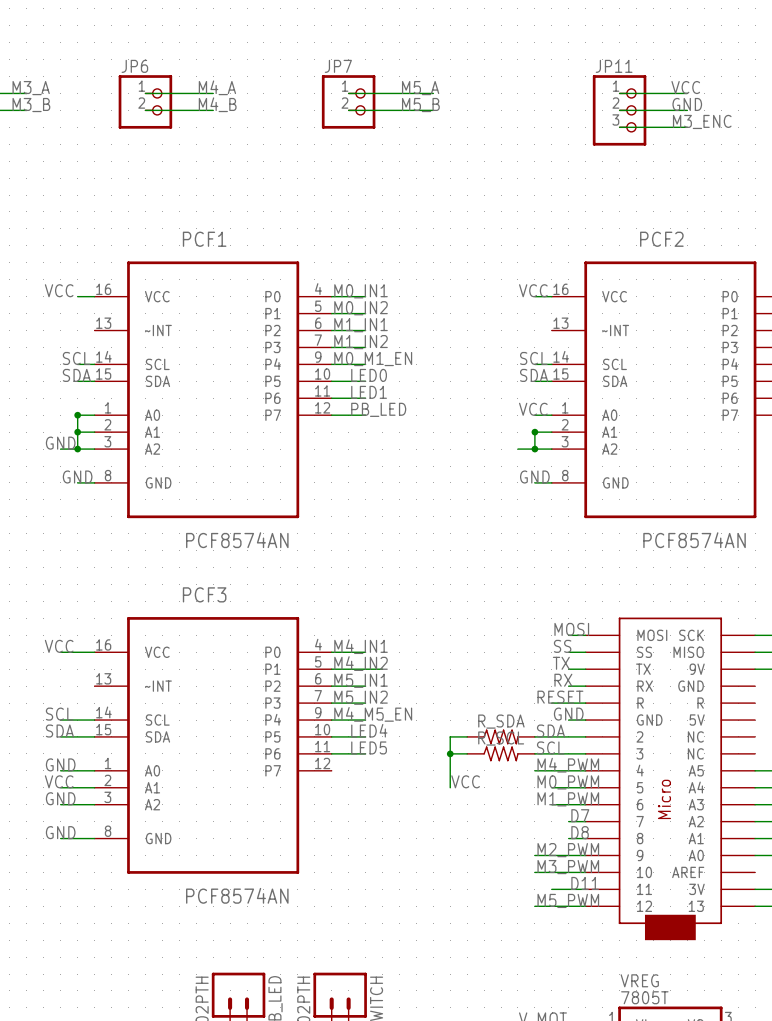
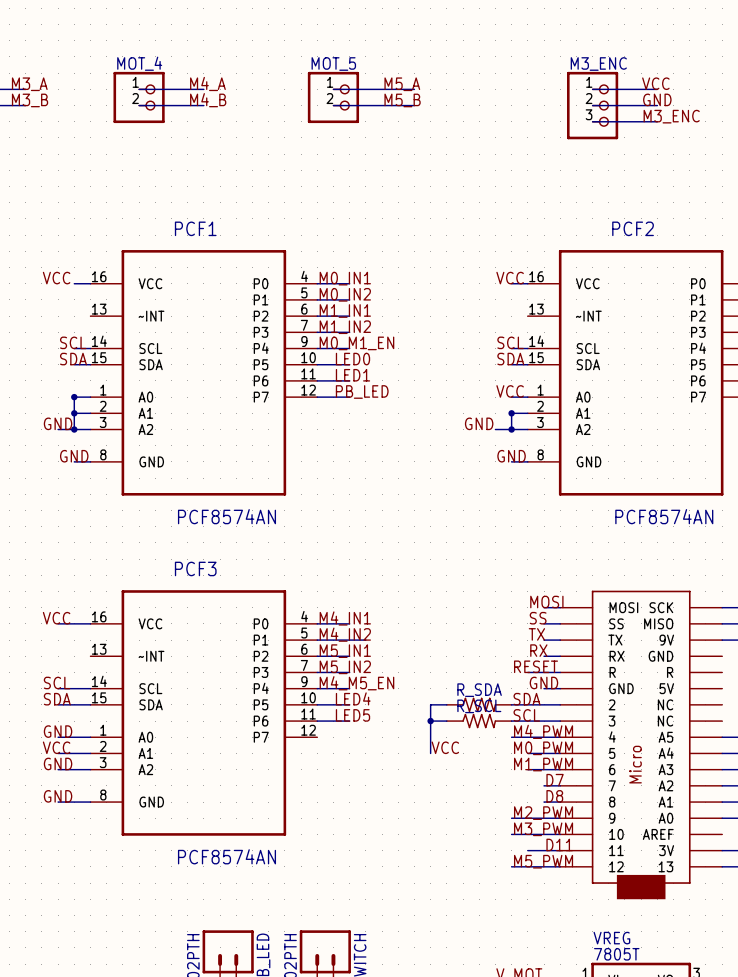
JP6 name: JP6 (134, 66) -> MOT_4 (139, 63)
JP7 name: JP7 (338, 66) -> MOT_5 (333, 64)
JP11 name: JP11 (614, 66) -> M3_ENC (598, 64)
label: none -> GND (479, 423)

